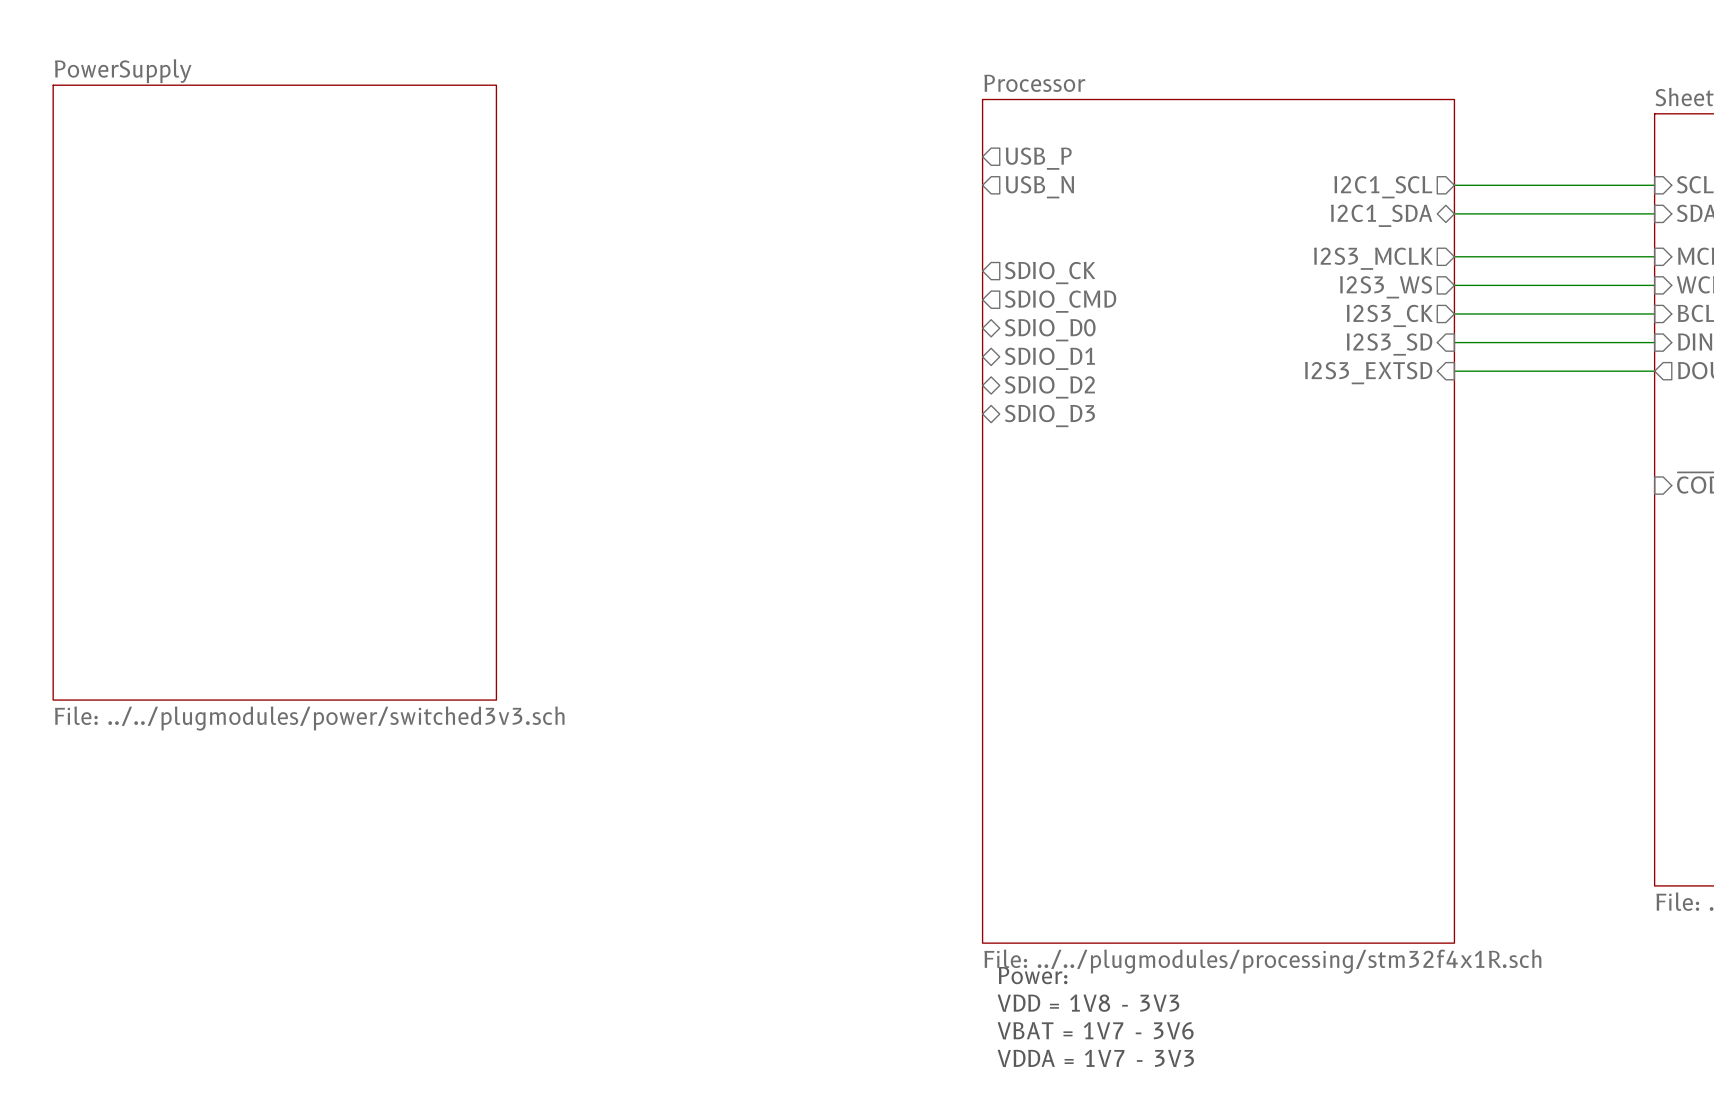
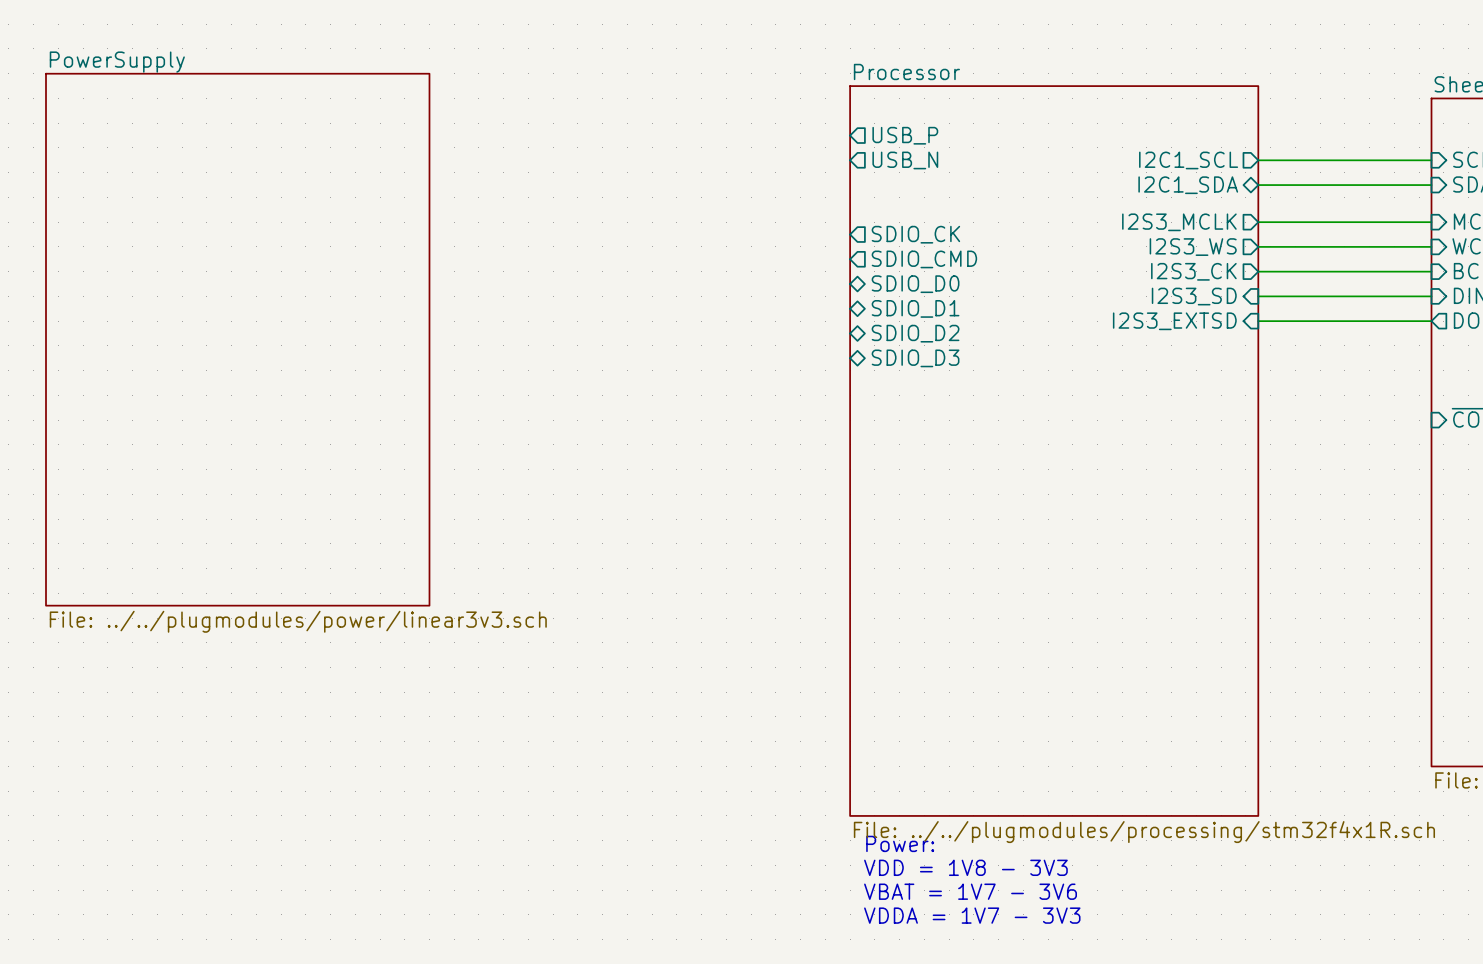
sheet PowerSupply value: File: ../../plugmodules/power/switched3v3.sch (309, 718) -> File: ../../plugmodules/power/linear3v3.sch (298, 621)

